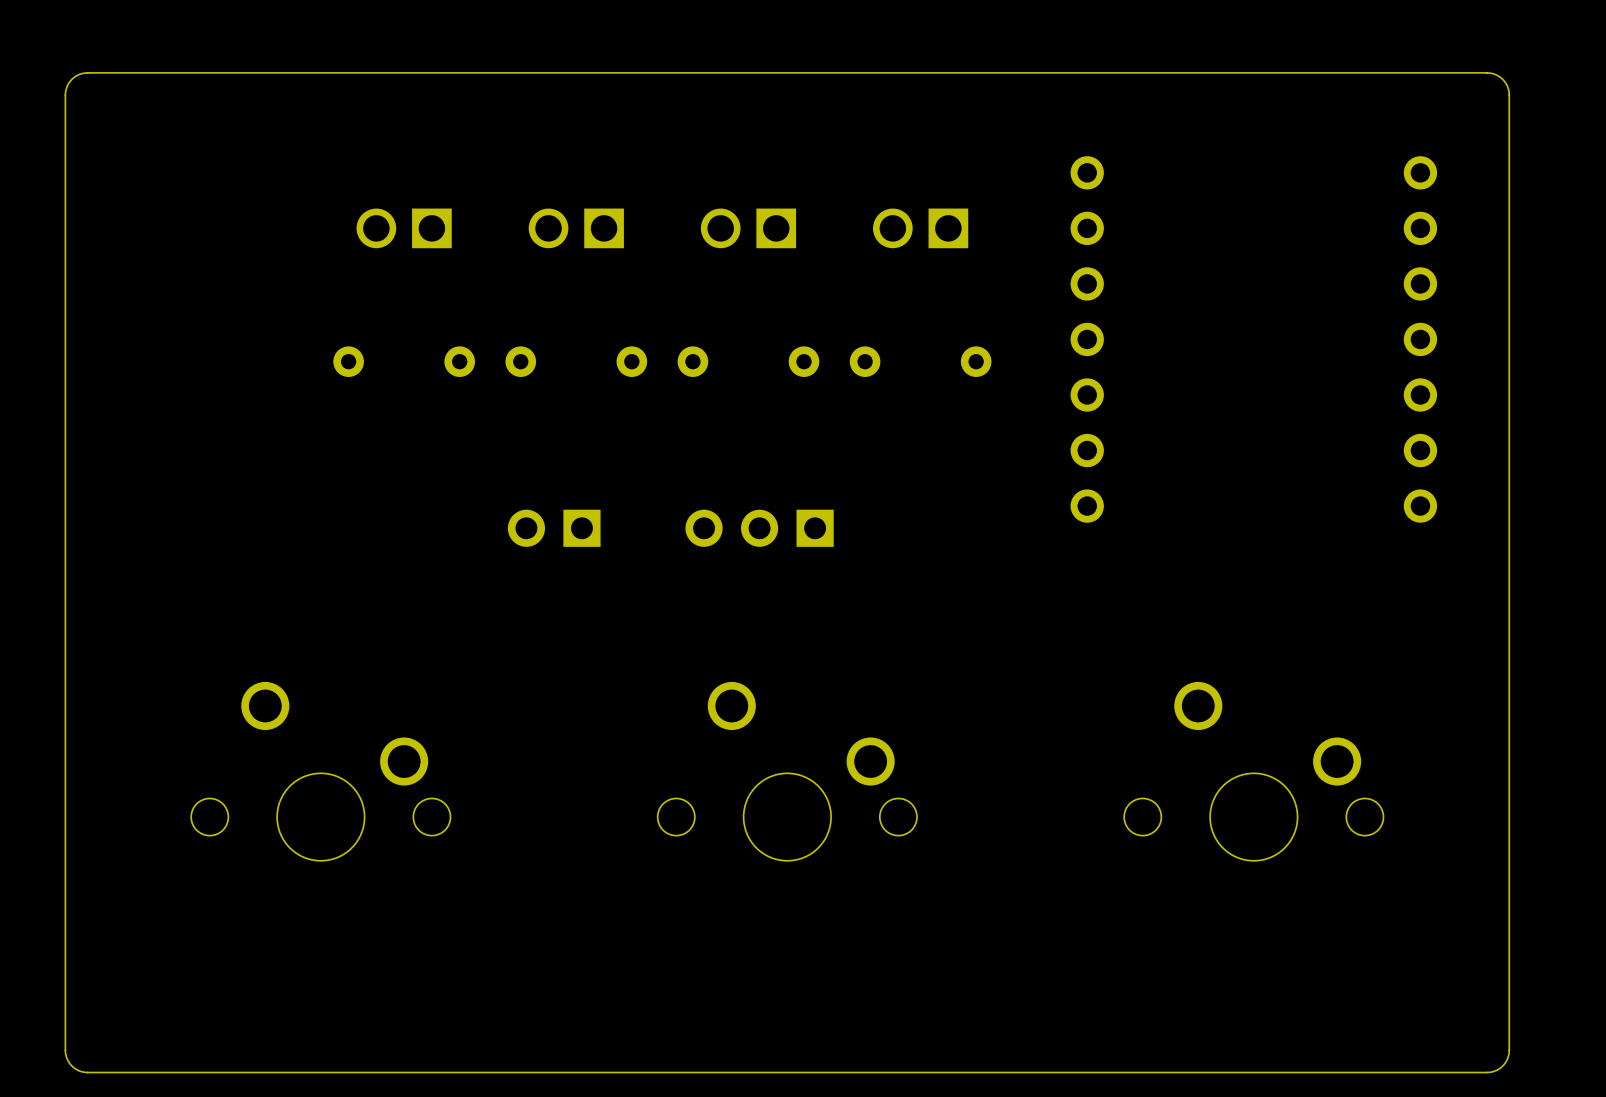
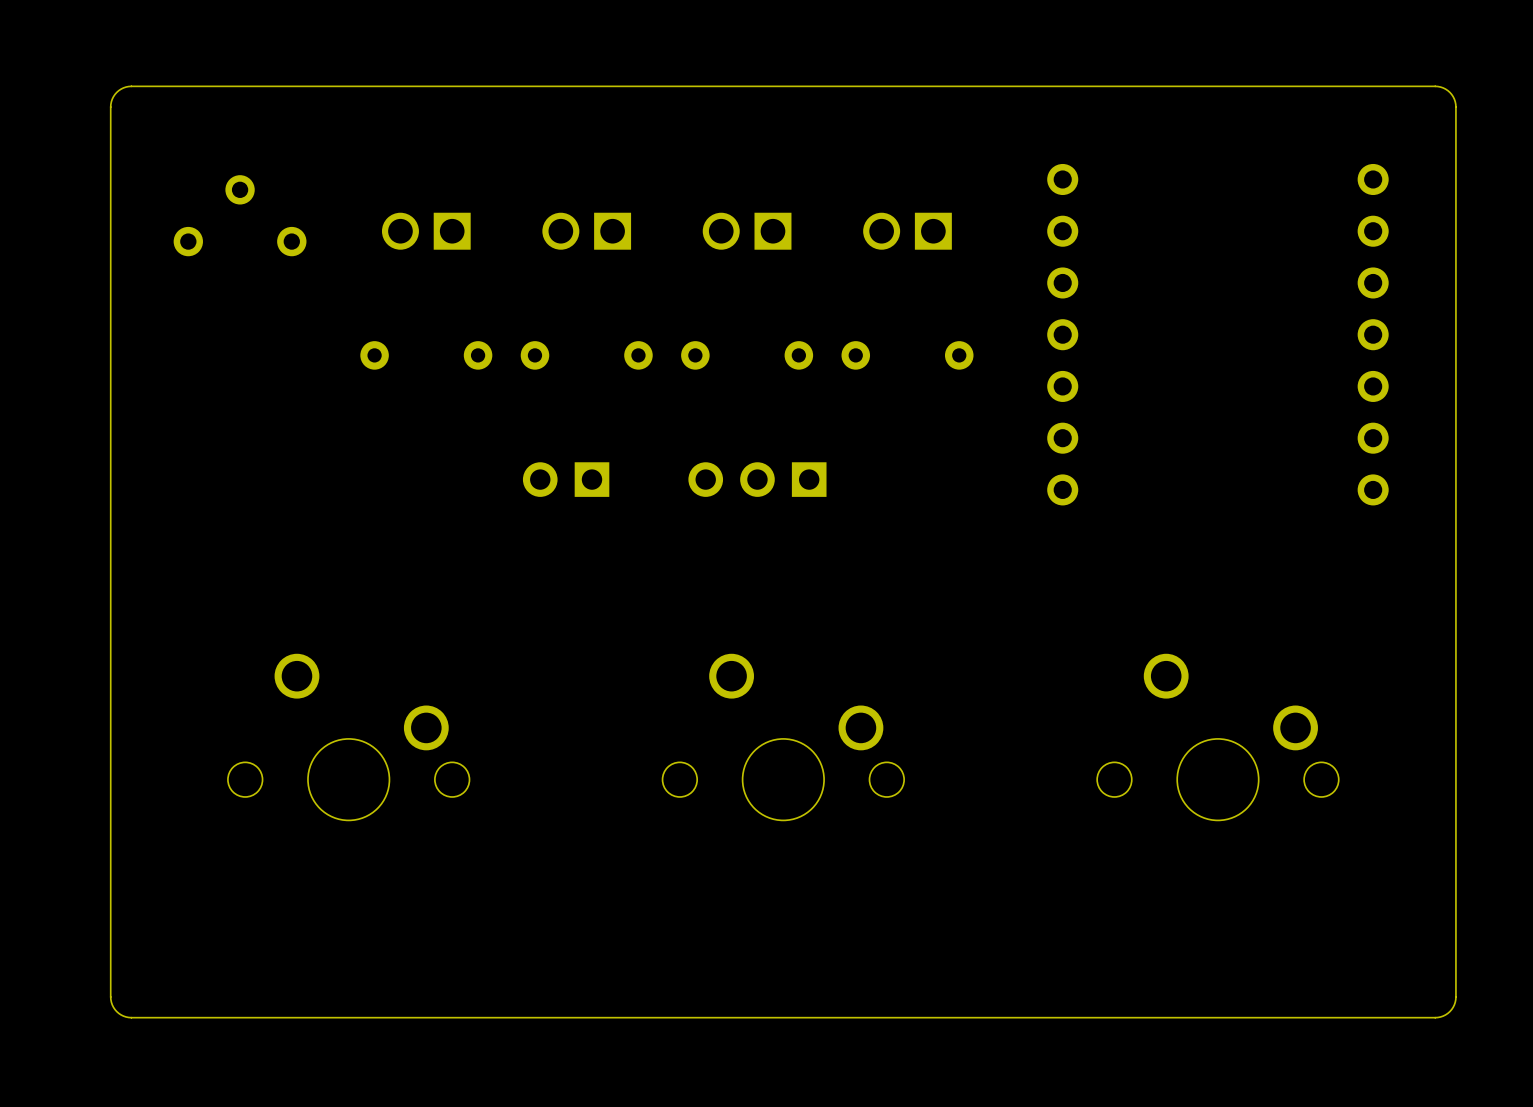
part: none -> (240, 215)
part position: (554, 528) -> (566, 479)
part position: (759, 528) -> (757, 479)

